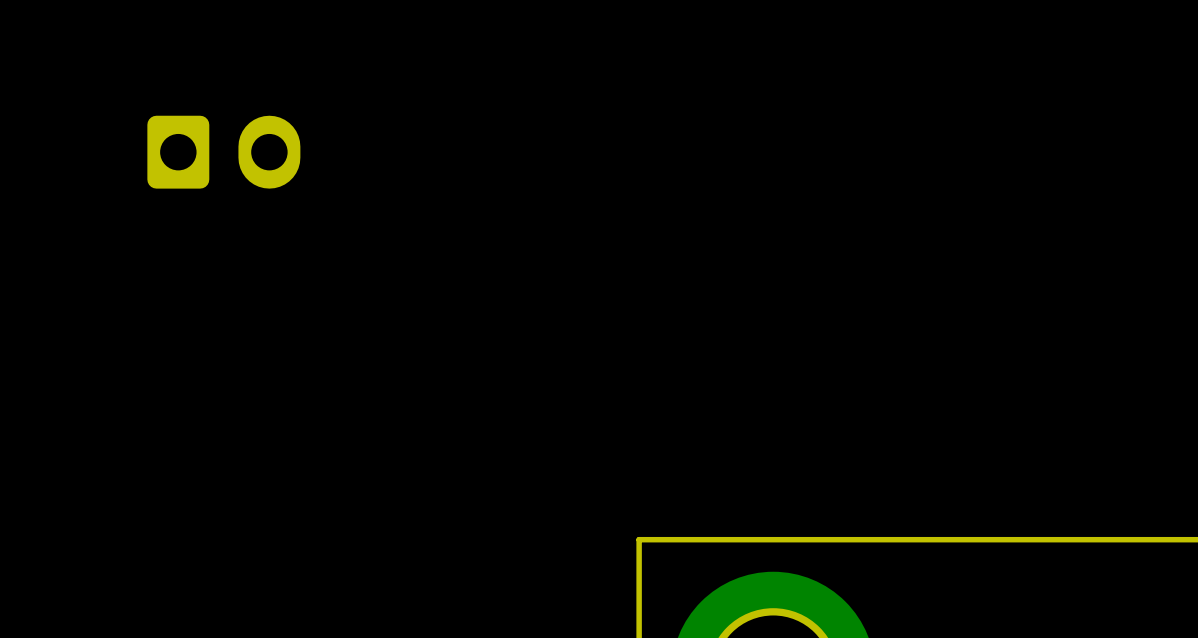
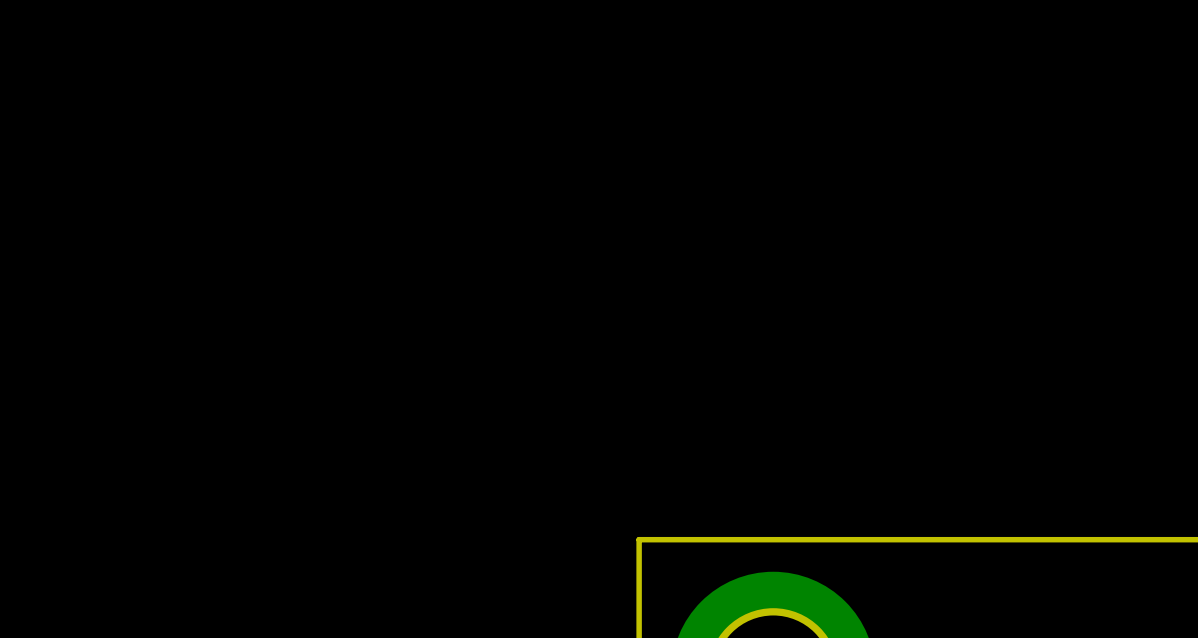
part: (223, 152) -> none

